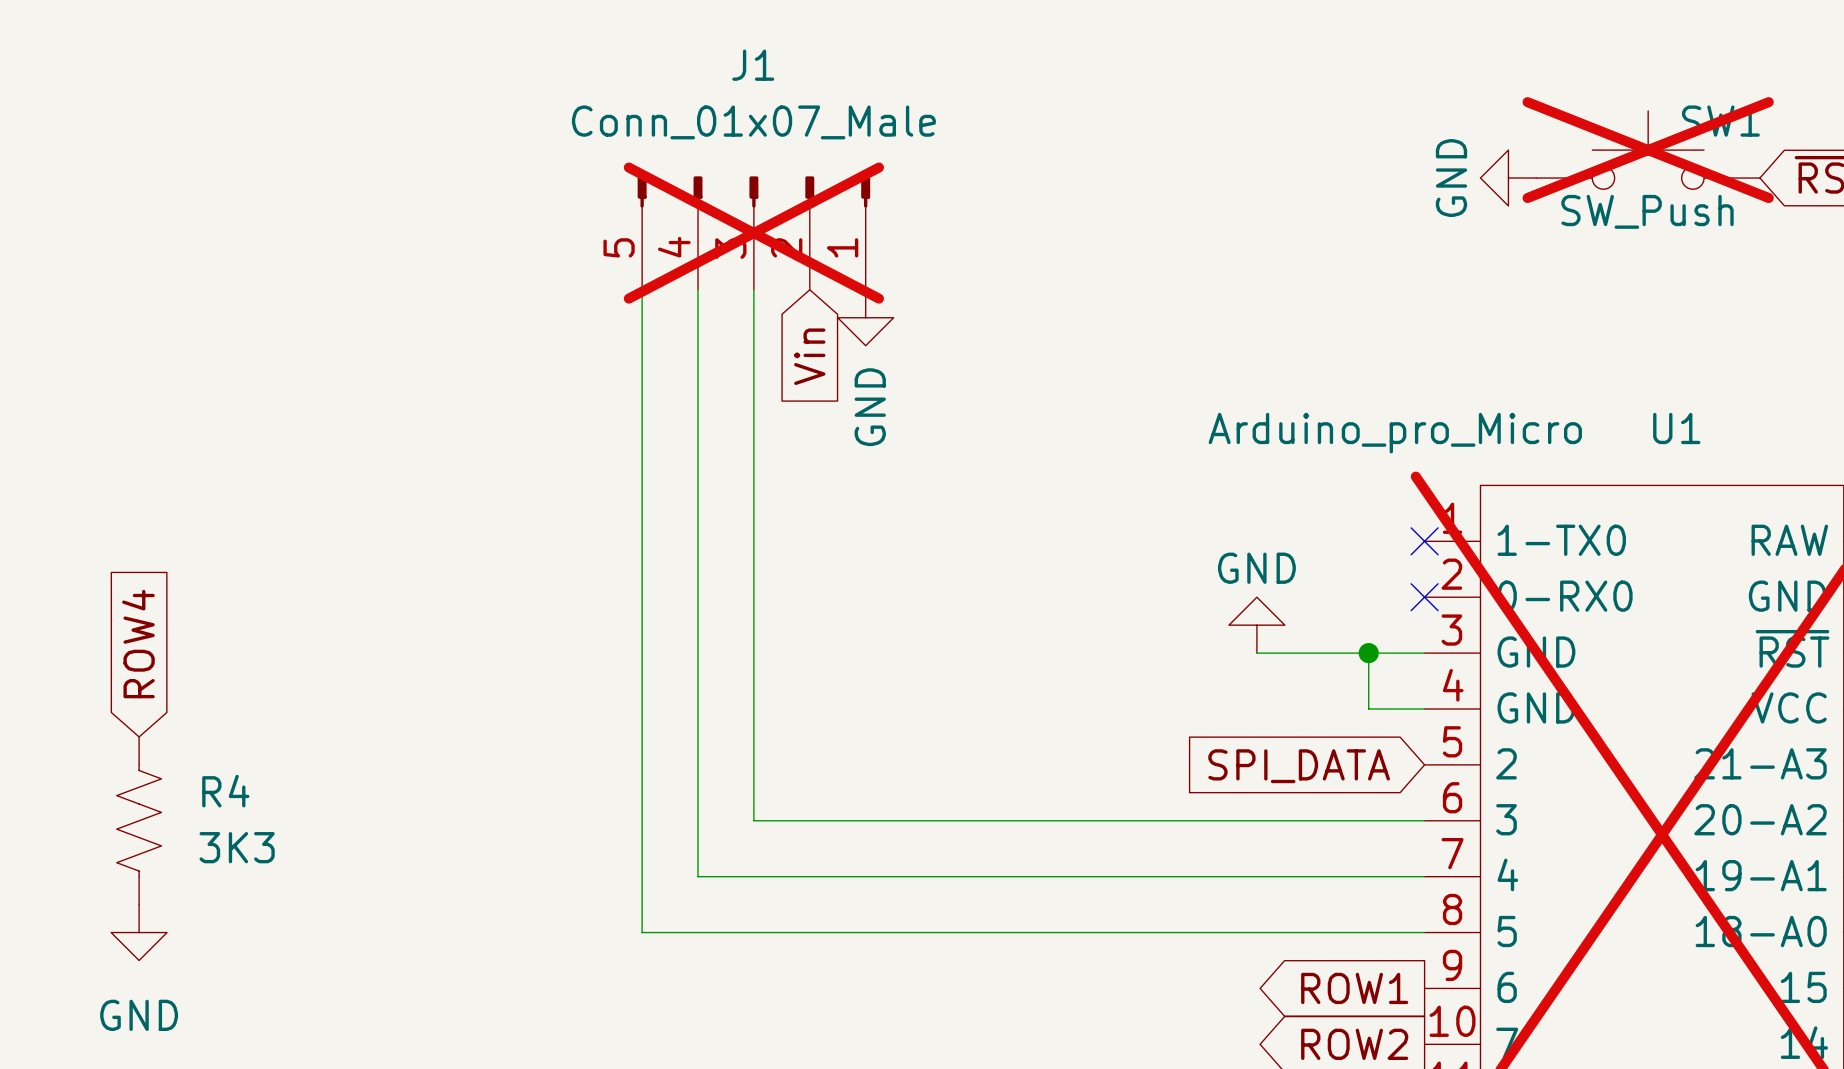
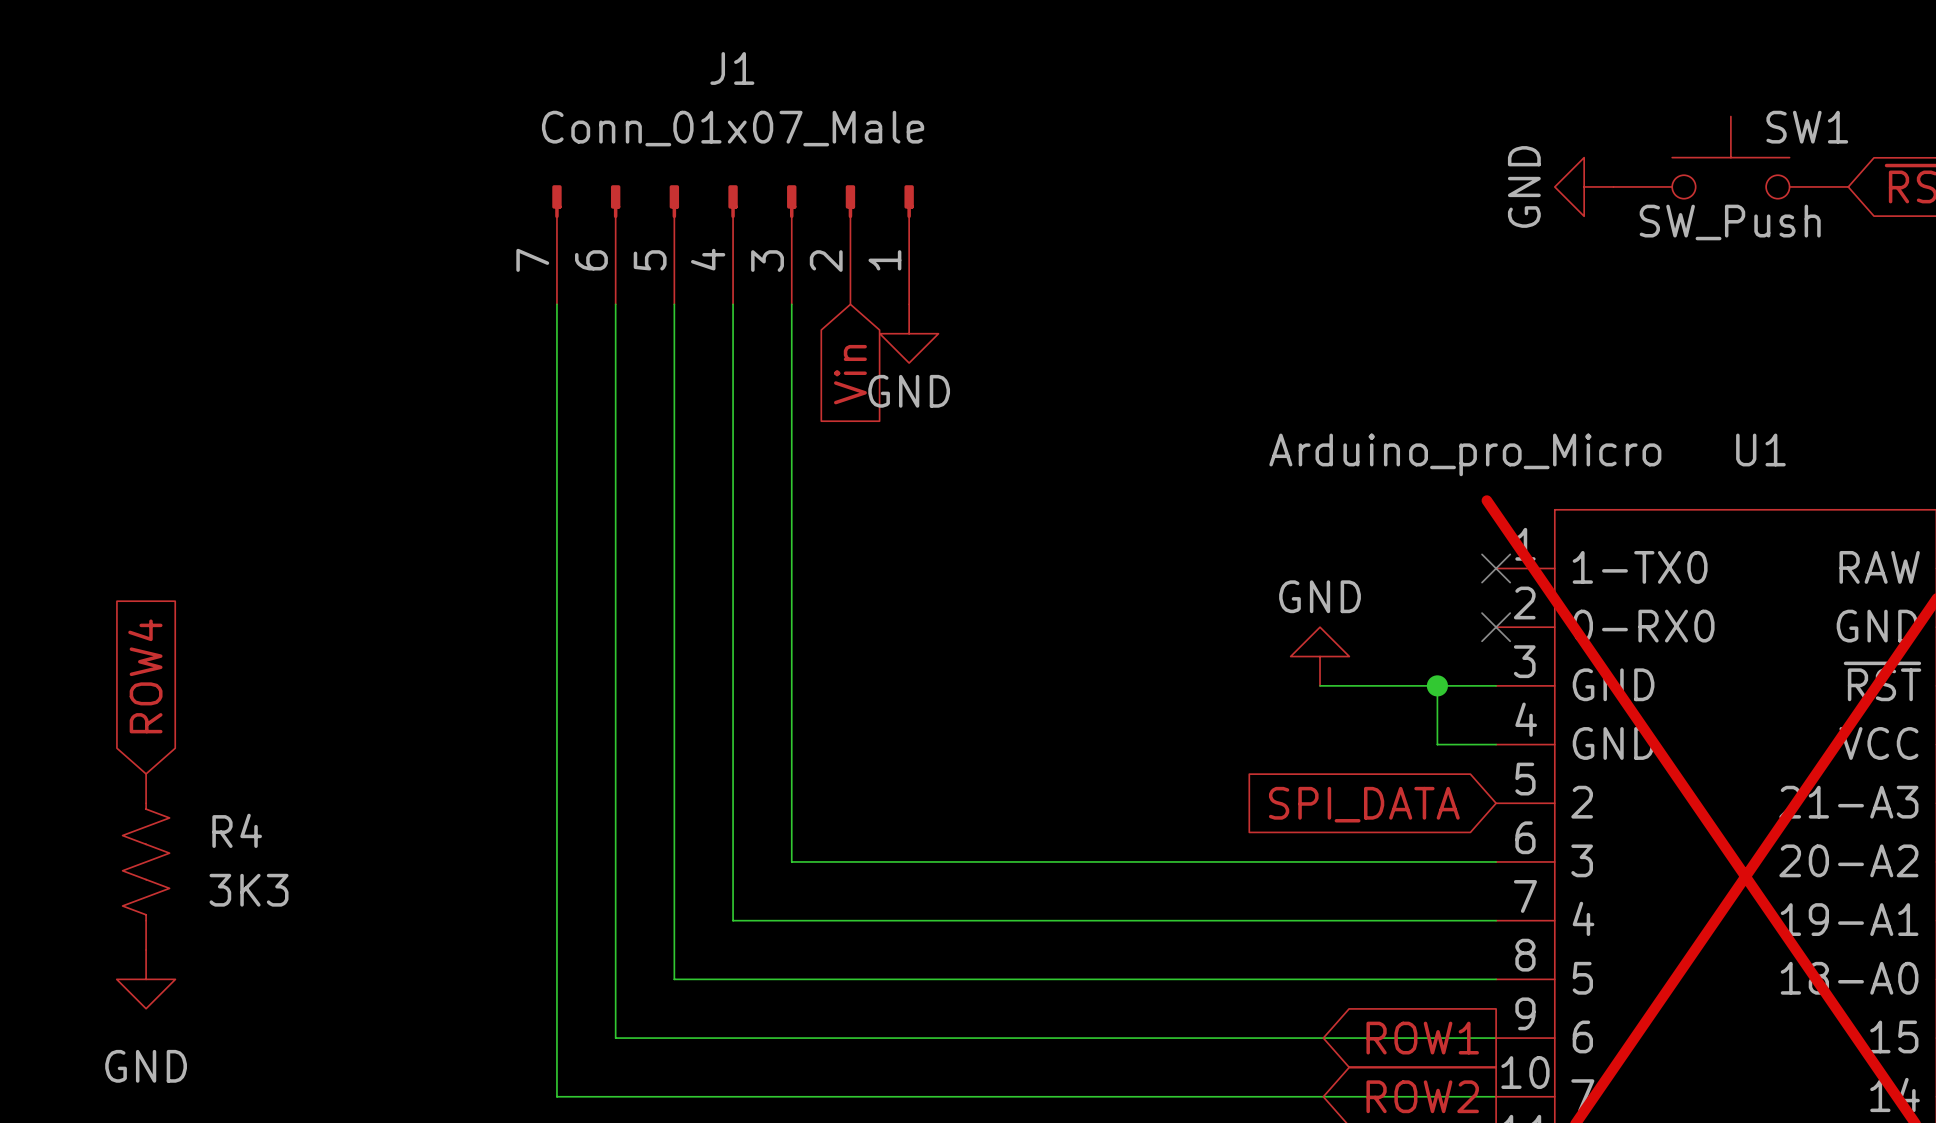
SW1 do-not-place cross: (1648, 150) -> none
J1 symbol: [637, 176, 871, 290] -> [552, 185, 914, 305]
J1 do-not-place cross: (753, 233) -> none
wire: none -> (556, 304) (556, 1096) (1496, 1096)
wire: none -> (615, 304) (615, 1038) (1496, 1038)
power symbol text rotation: 0° (870, 407) -> 90° clockwise (909, 391)

